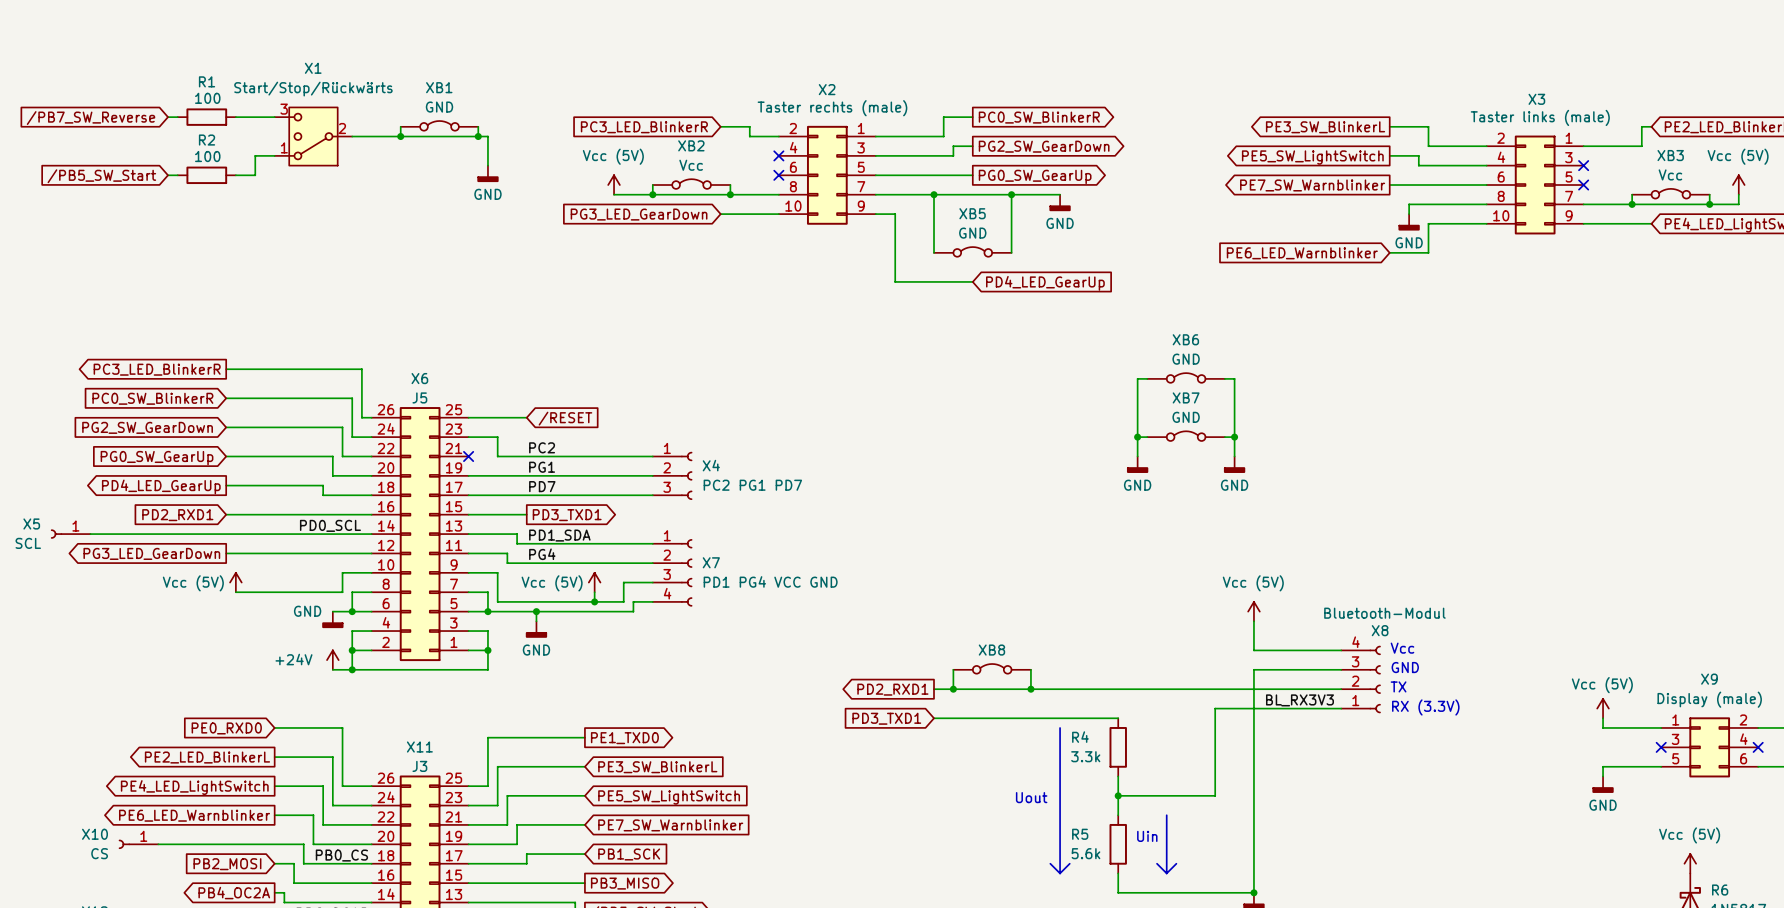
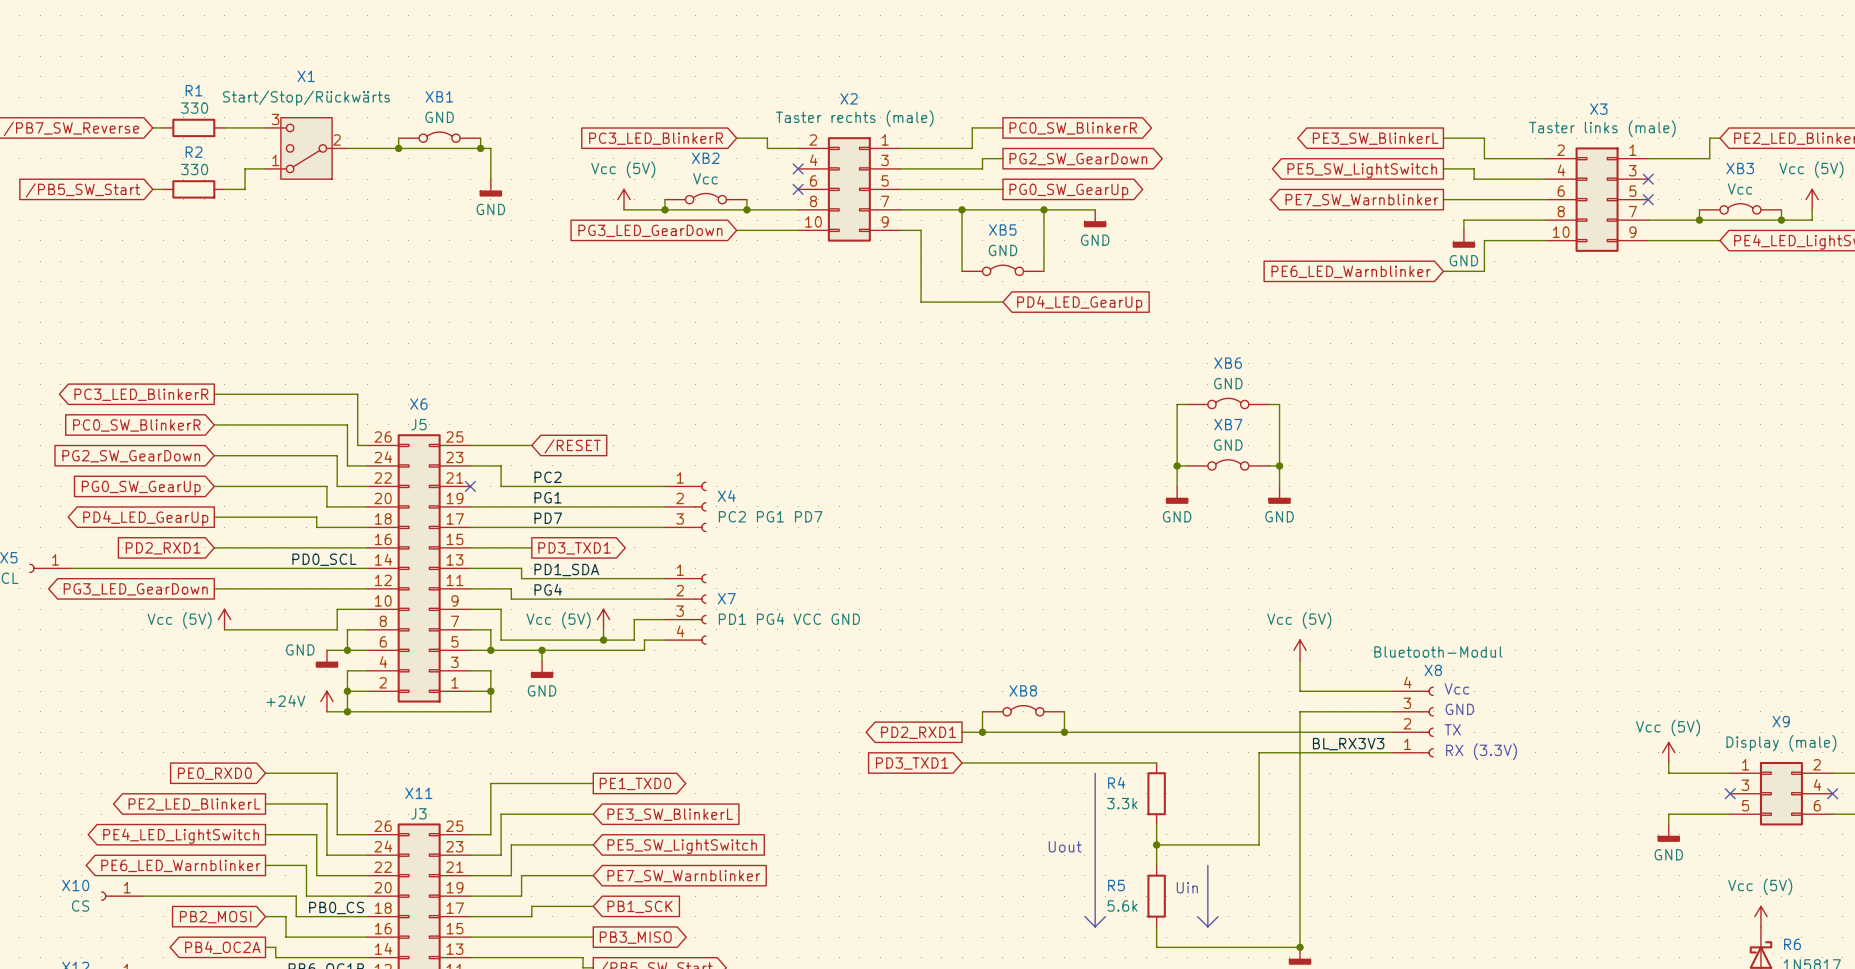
R1 value: 100 (207, 98) -> 330 (194, 108)
R2 value: 100 (207, 156) -> 330 (194, 169)

